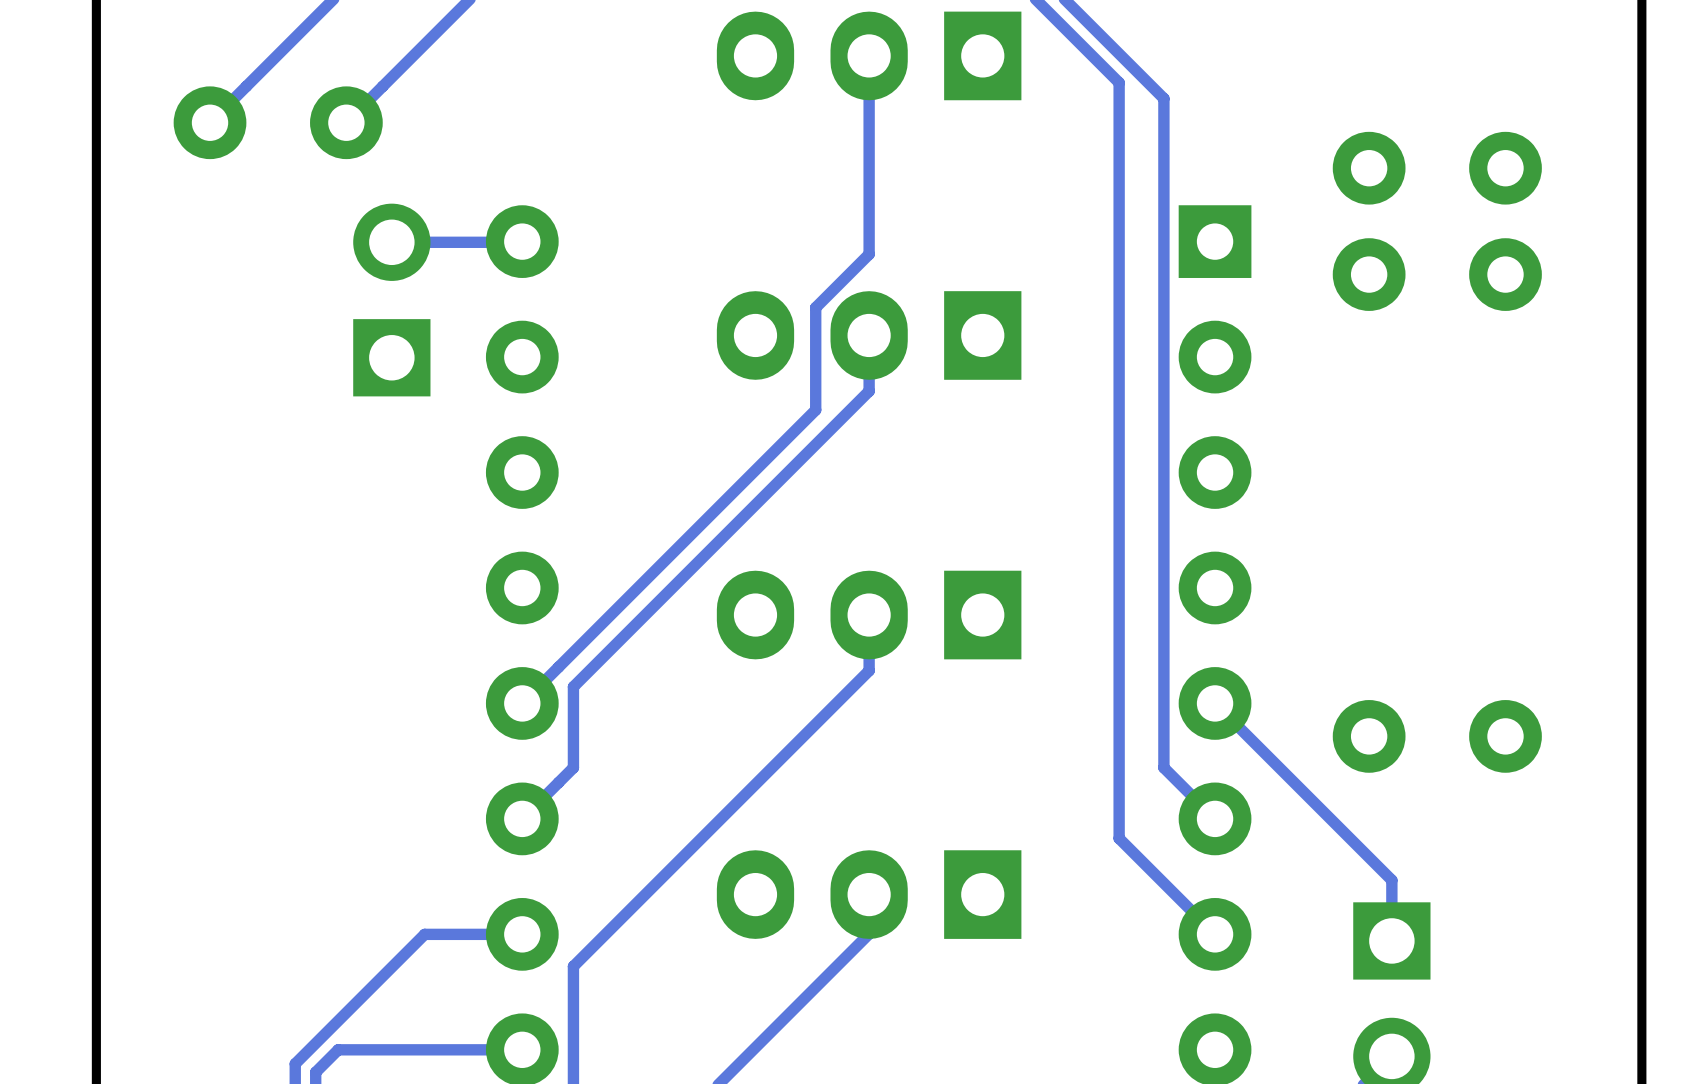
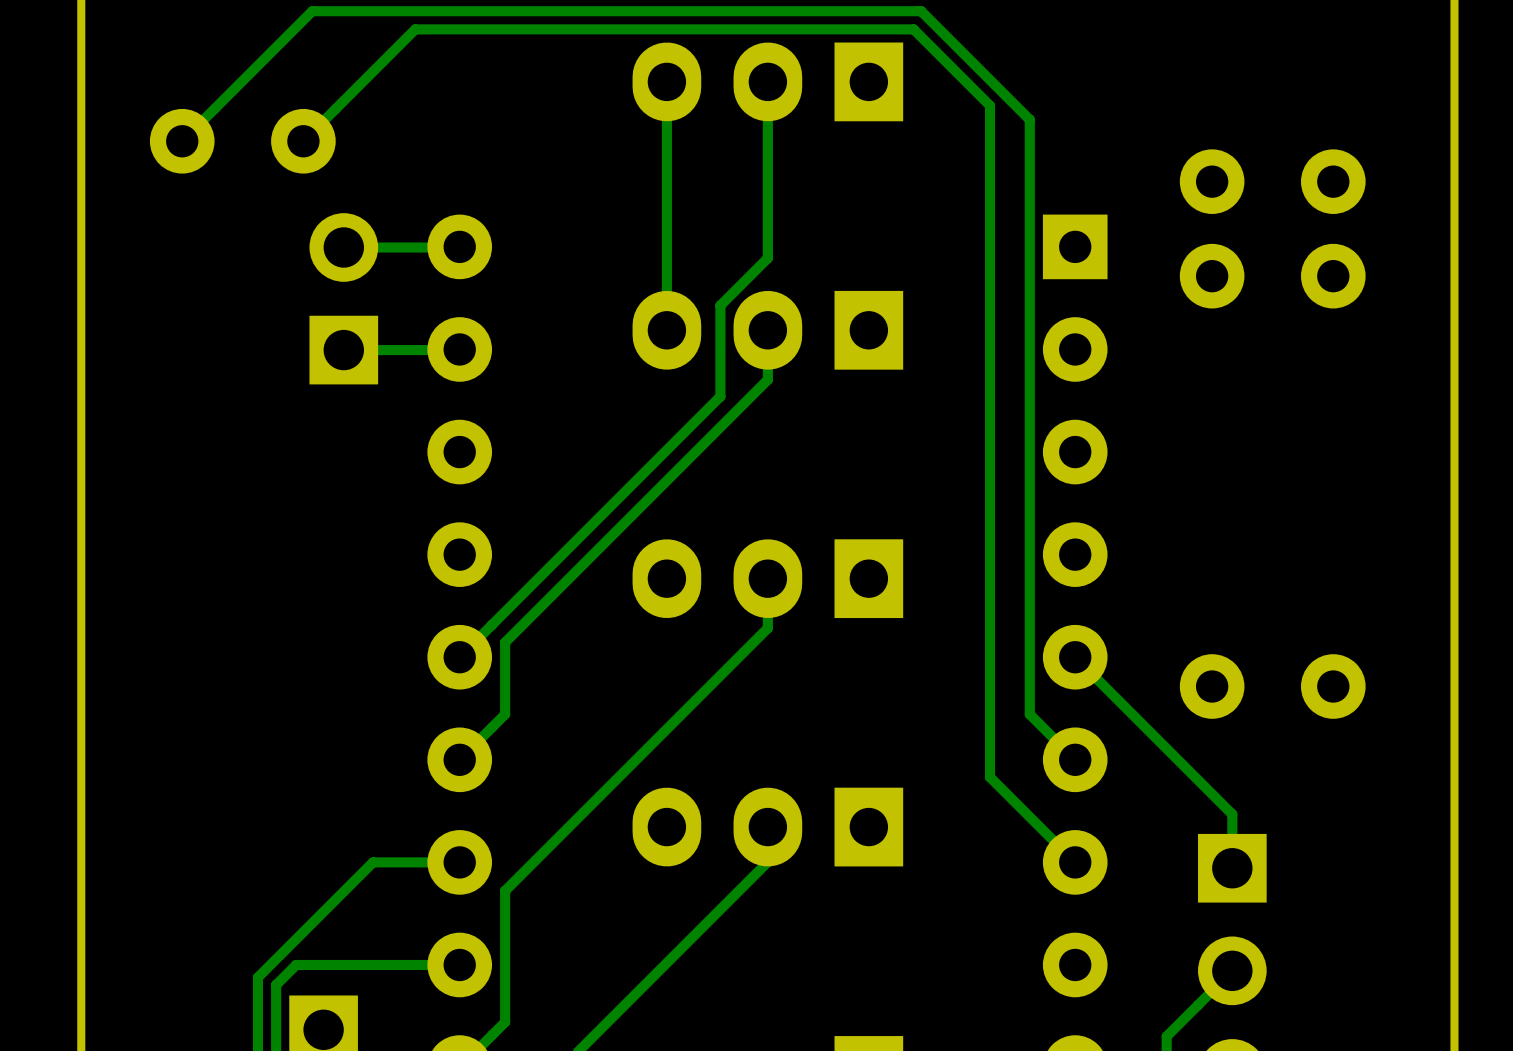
track: none -> (666, 81) (666, 330)
track: none -> (459, 349) (343, 350)

